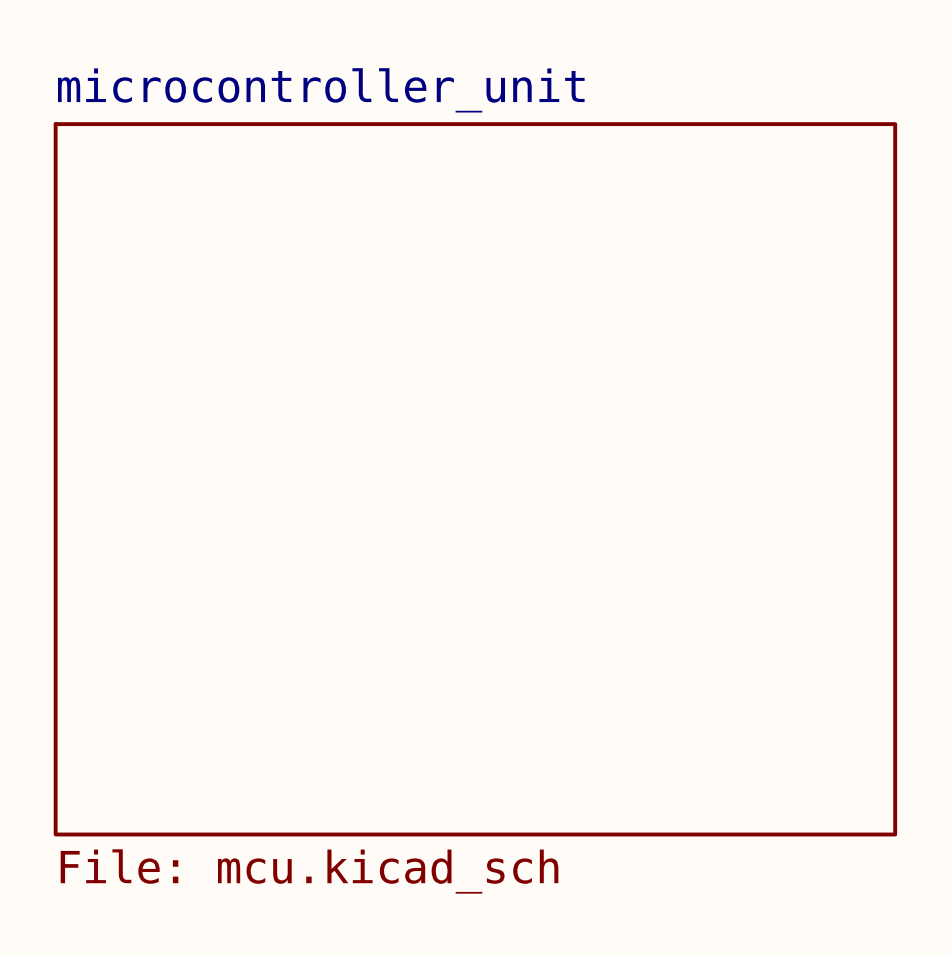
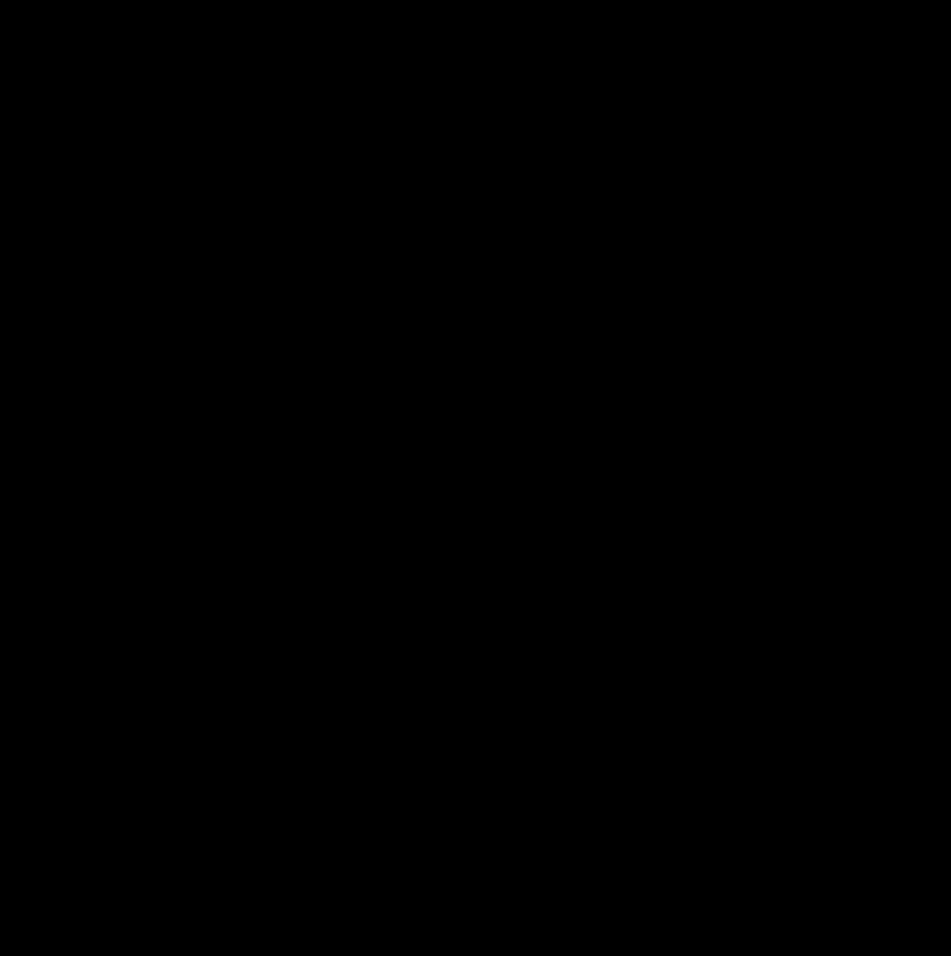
sheet microcontroller_unit: File: mcu.kicad_sch (475, 479) -> none

